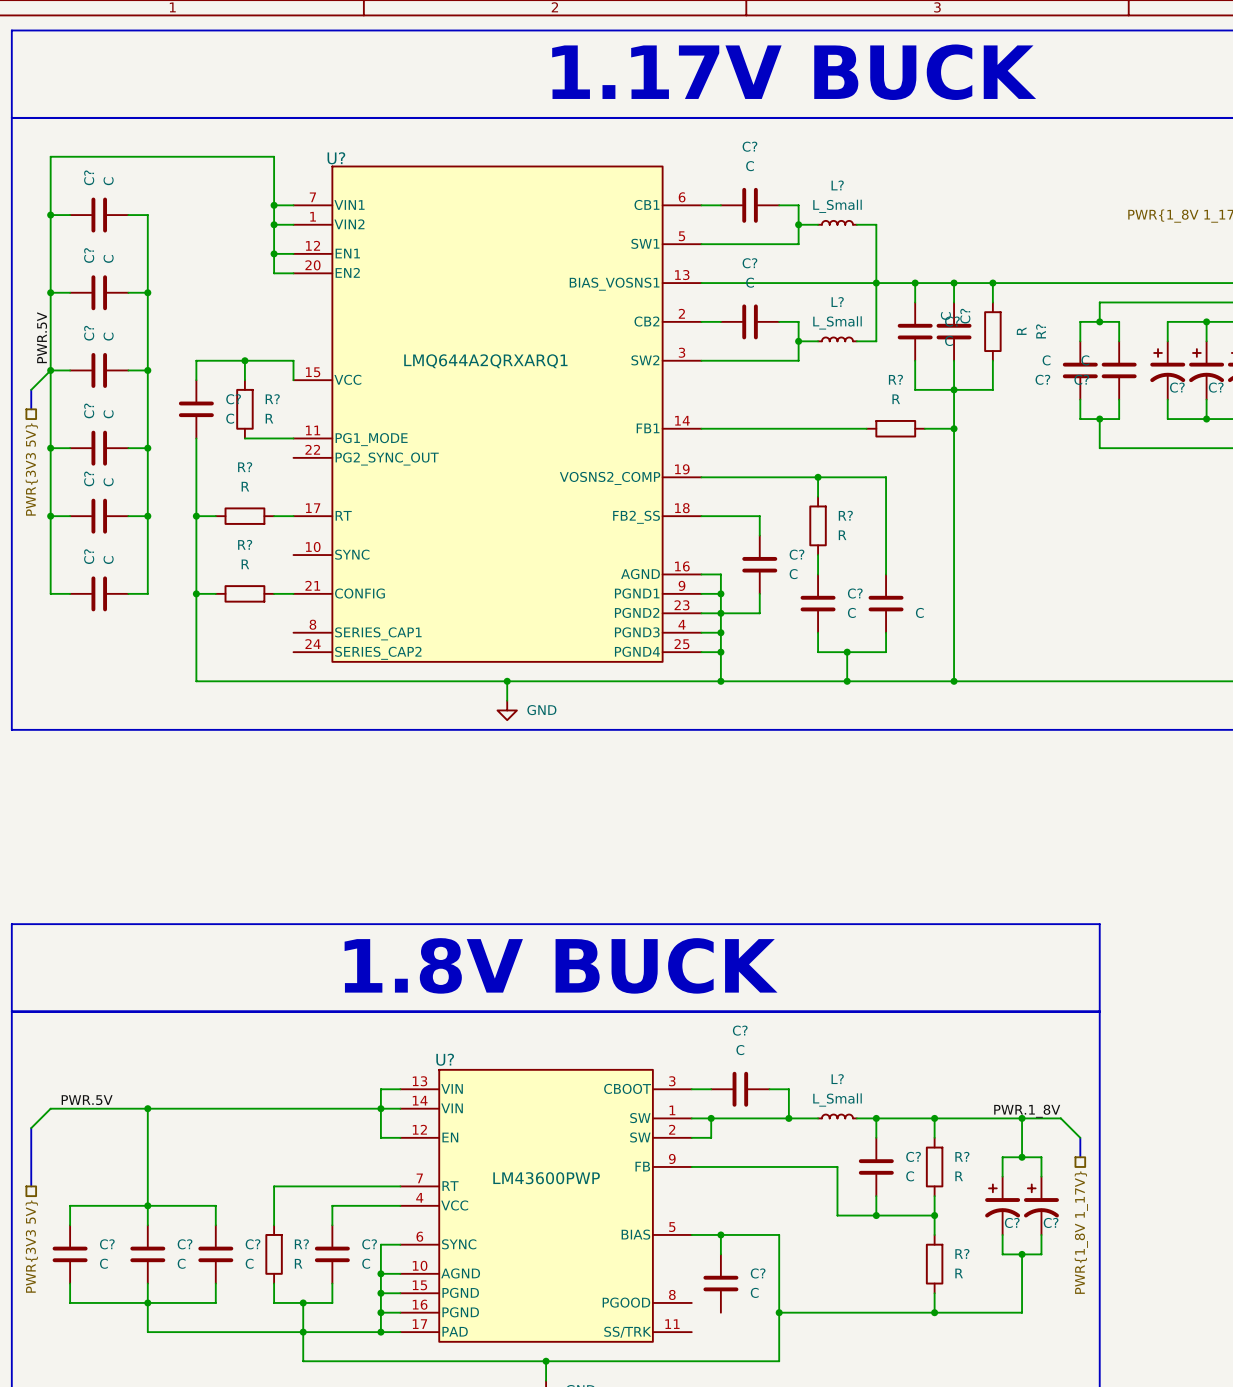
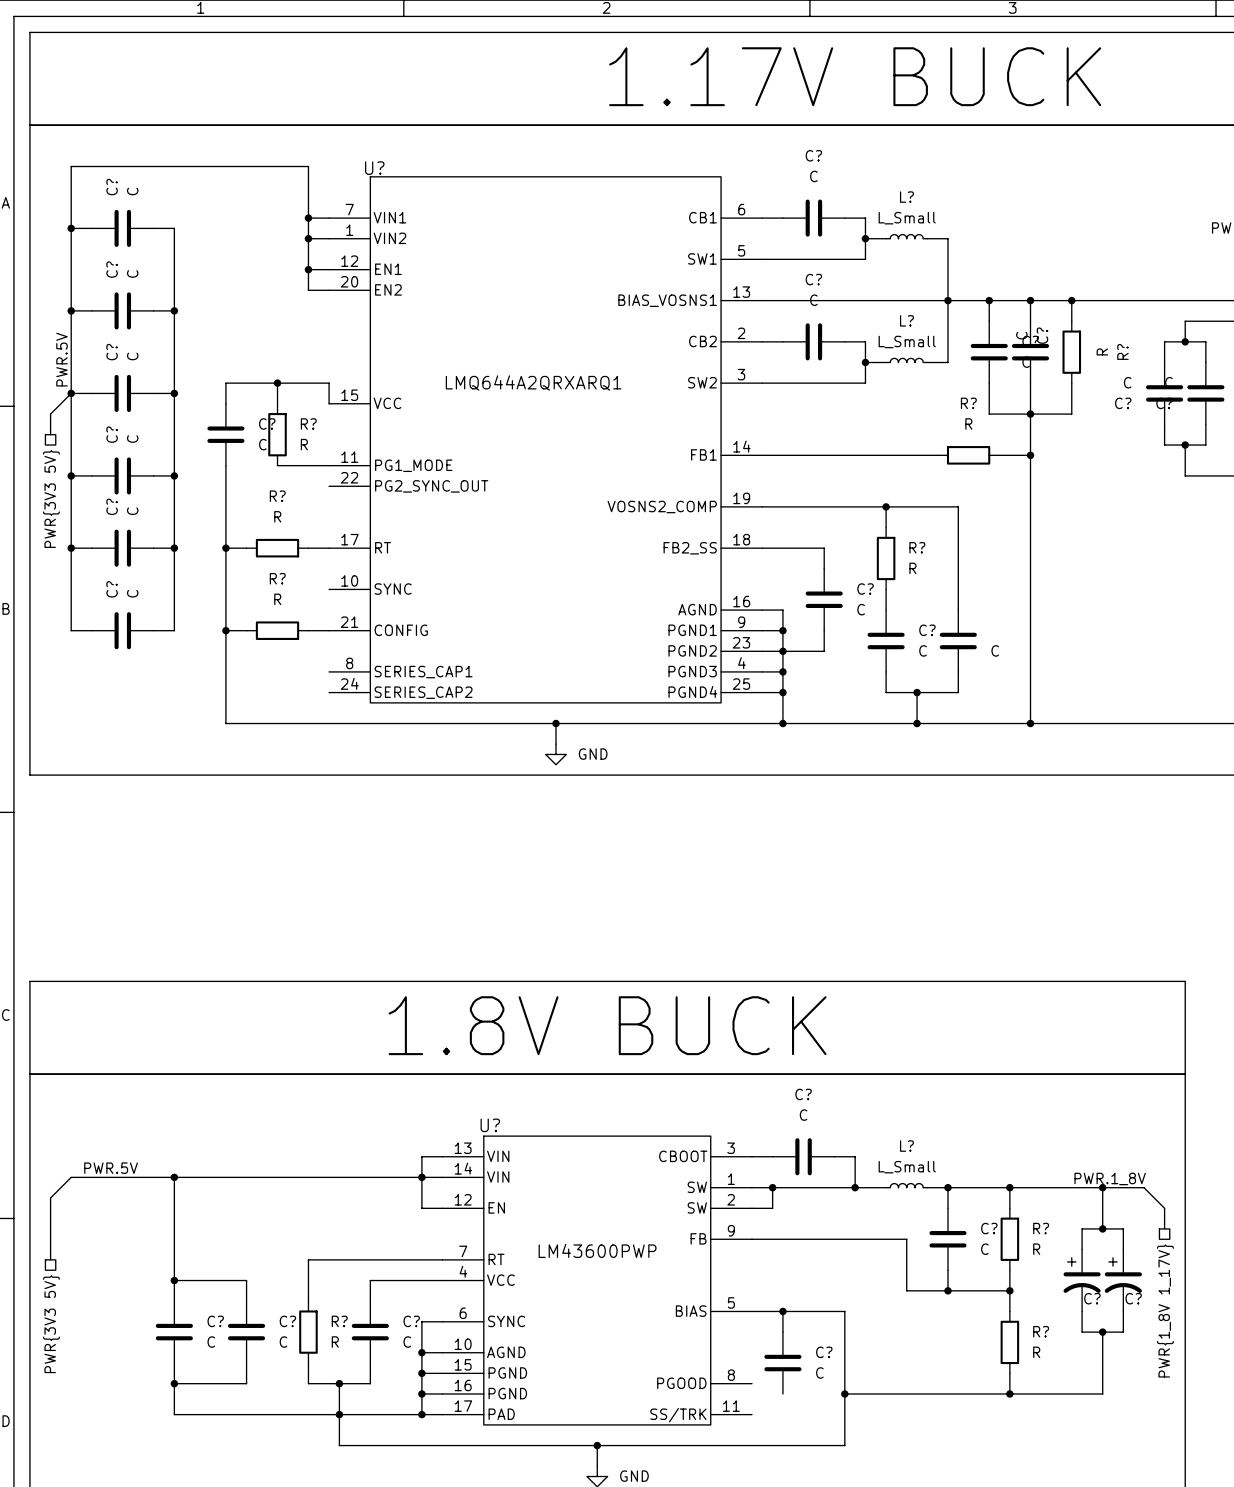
wire: (147, 1205) (70, 1205) (70, 1225) -> none
C?: C (70, 1254) -> none
wire: (70, 1283) (70, 1302) (147, 1302) -> none

